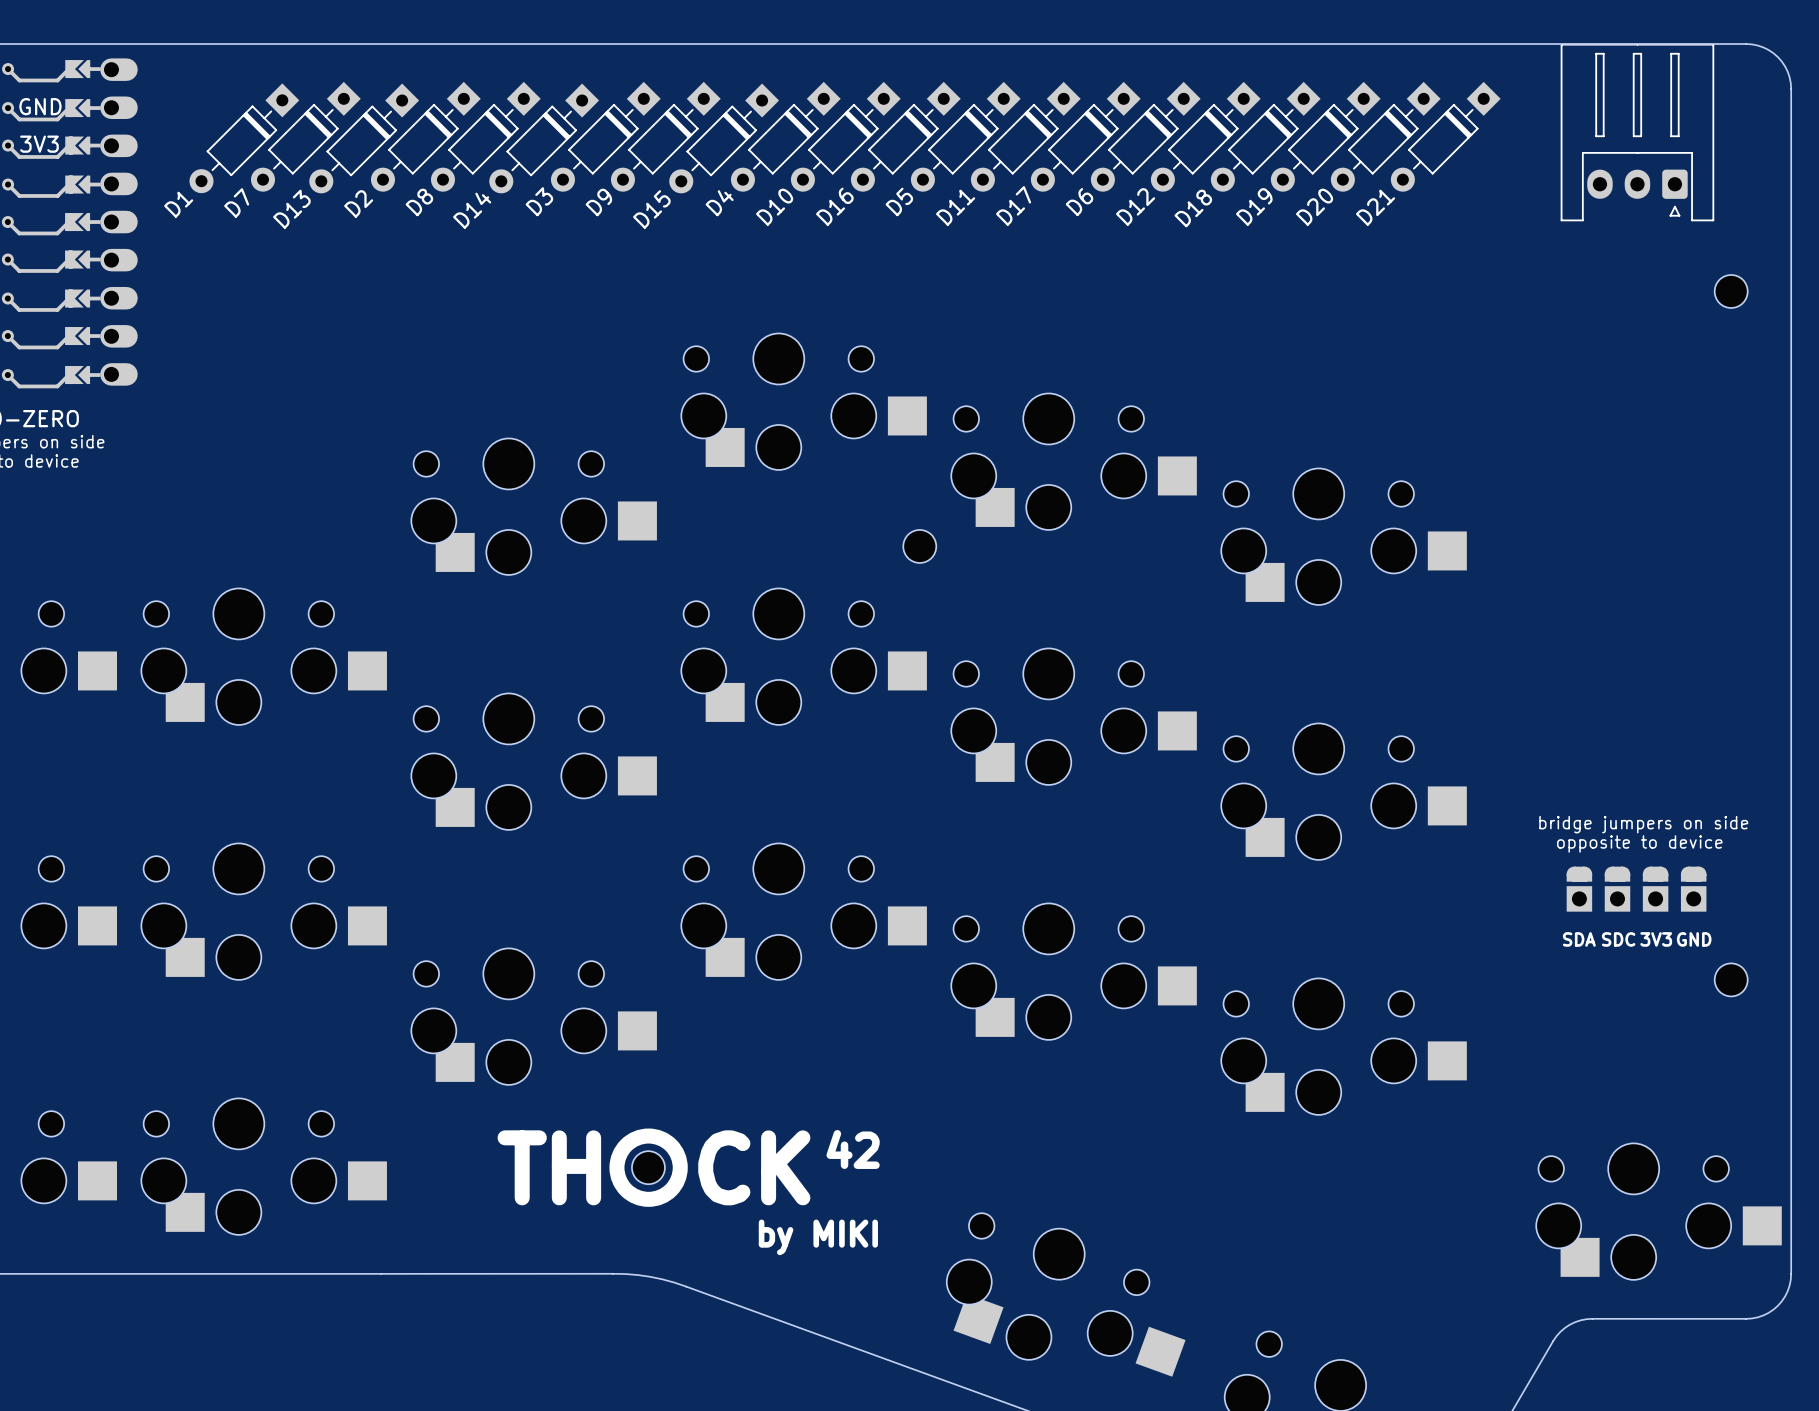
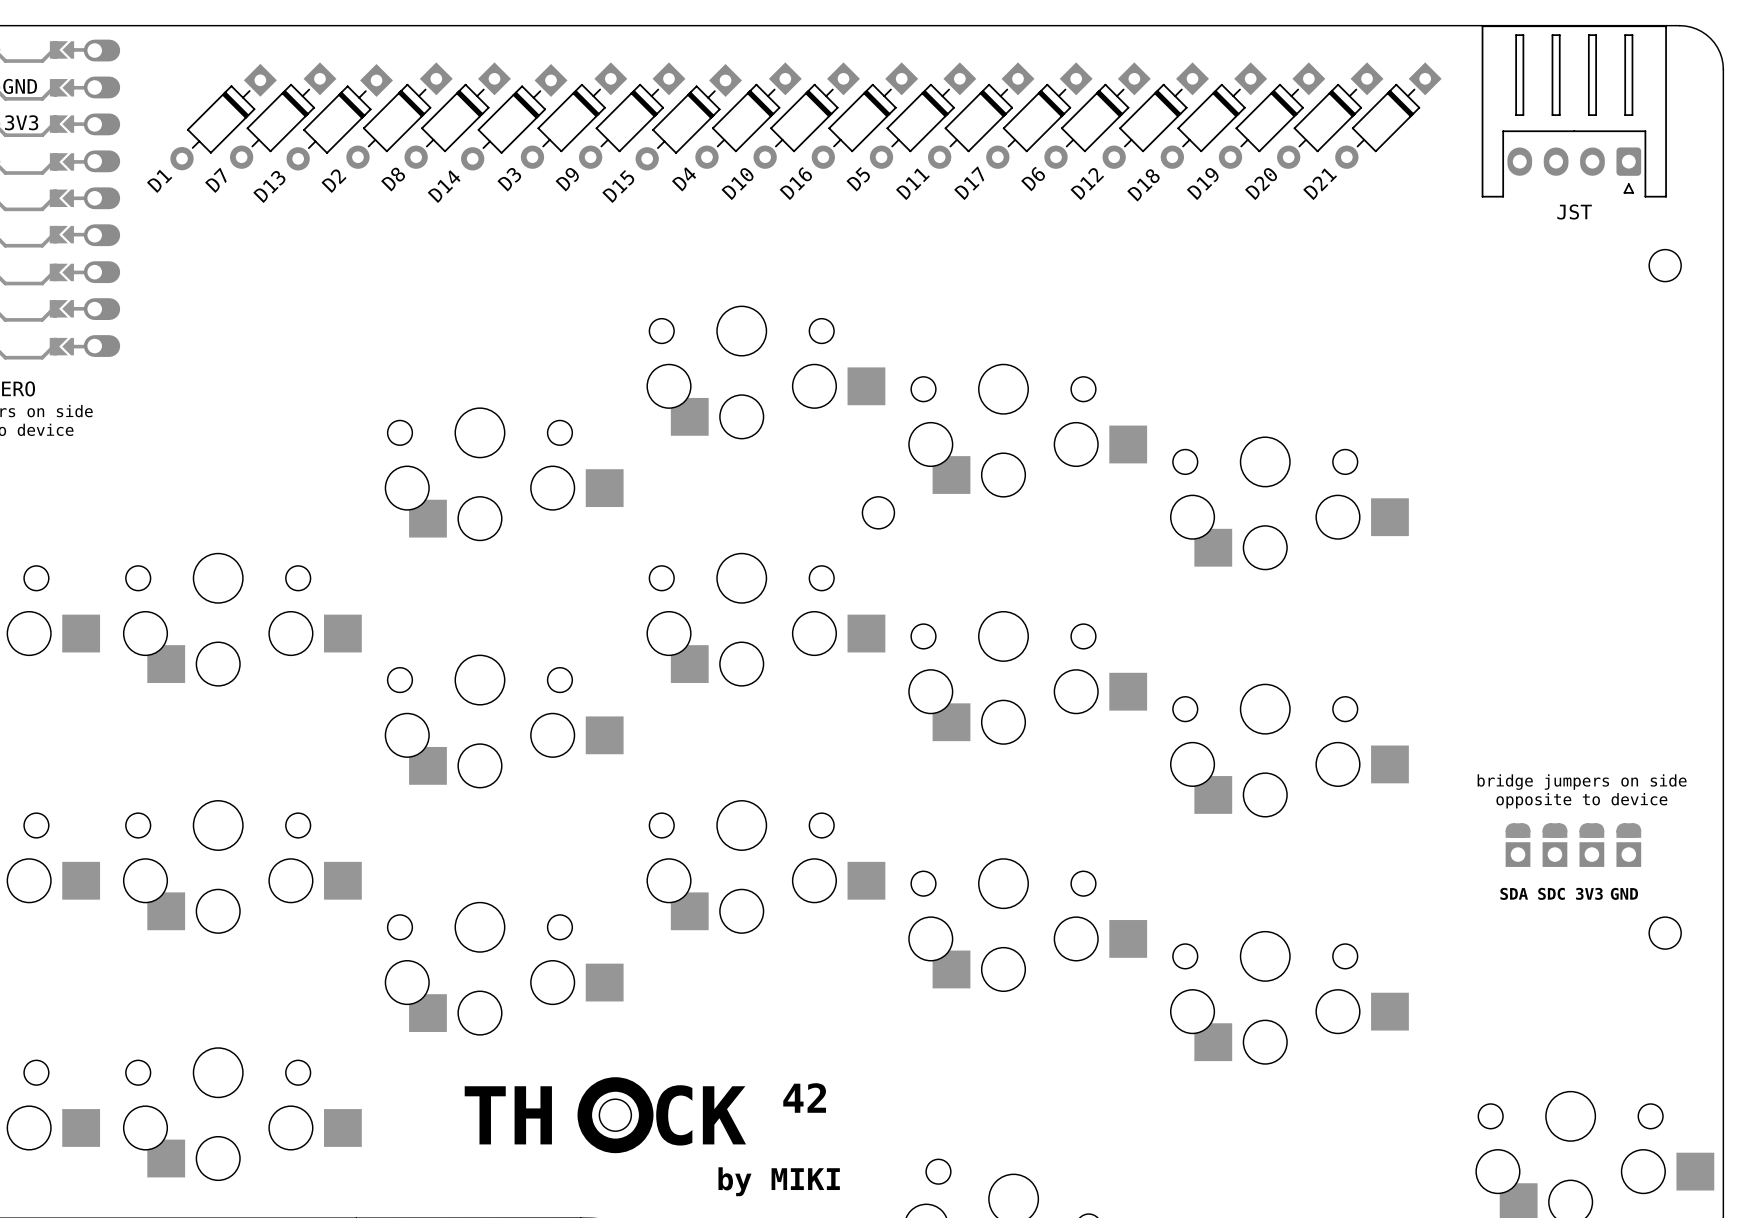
part: (1637, 132) -> none
JST: none -> (1574, 111)
drawing: none -> [1623, 183, 1635, 194]

